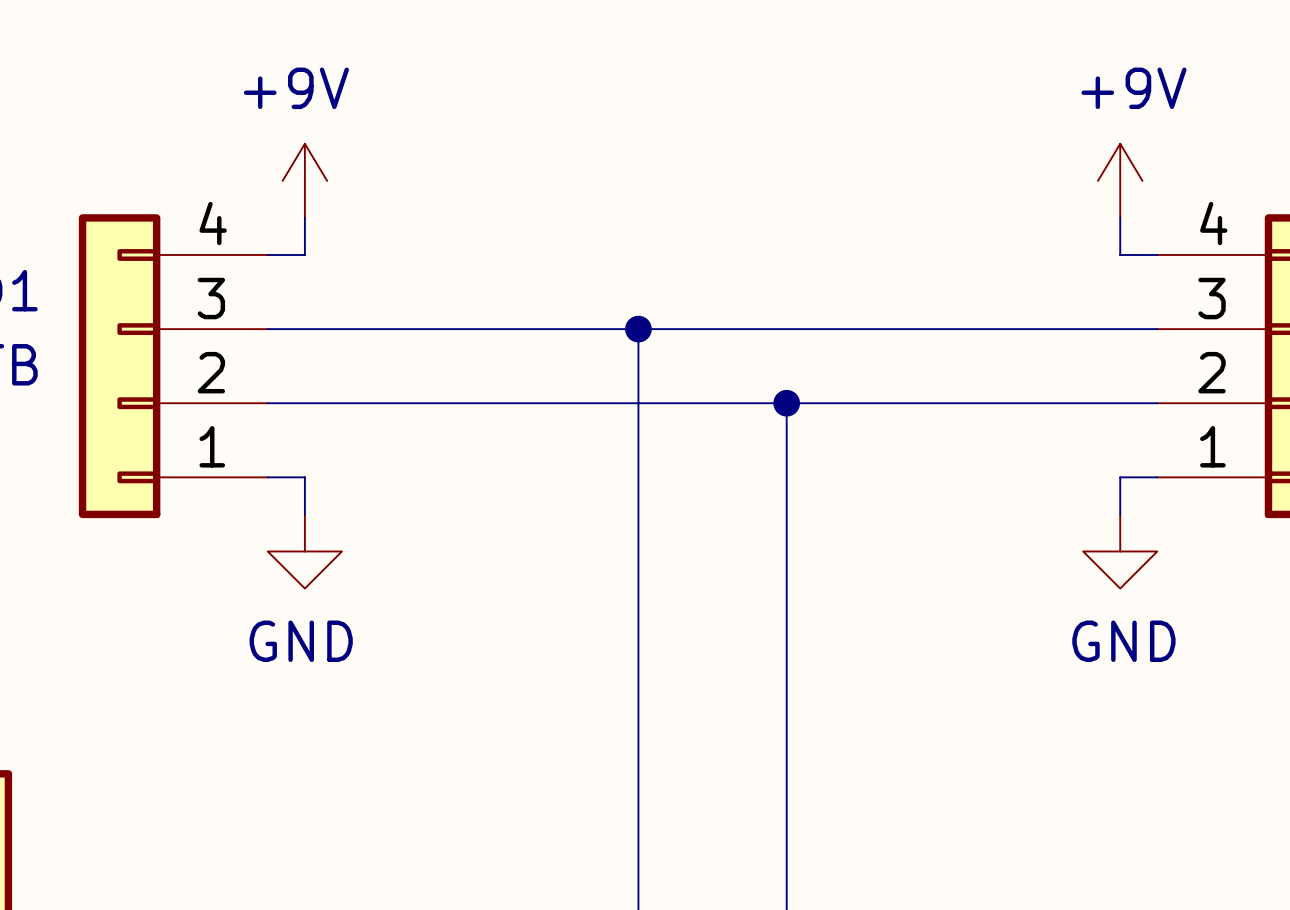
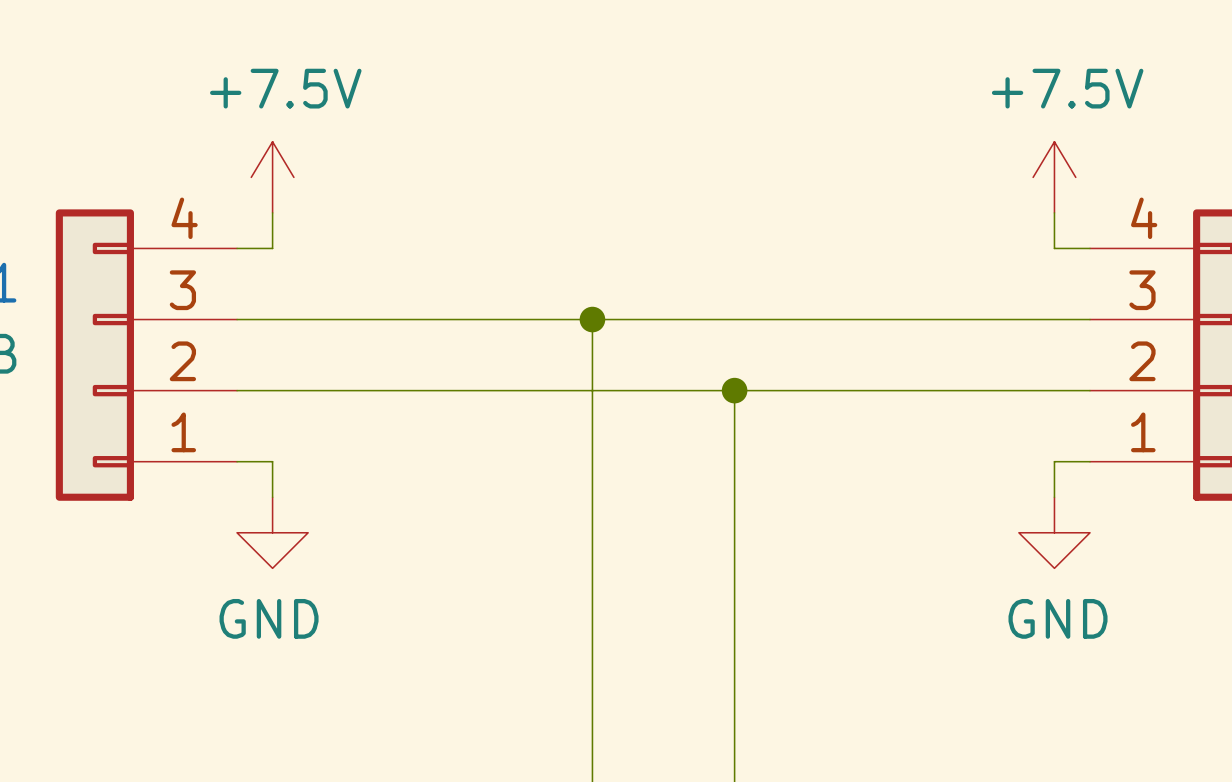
power symbol: +9V (304, 180) -> +7.5V (272, 177)
power symbol: +9V (1120, 180) -> +7.5V (1054, 177)

